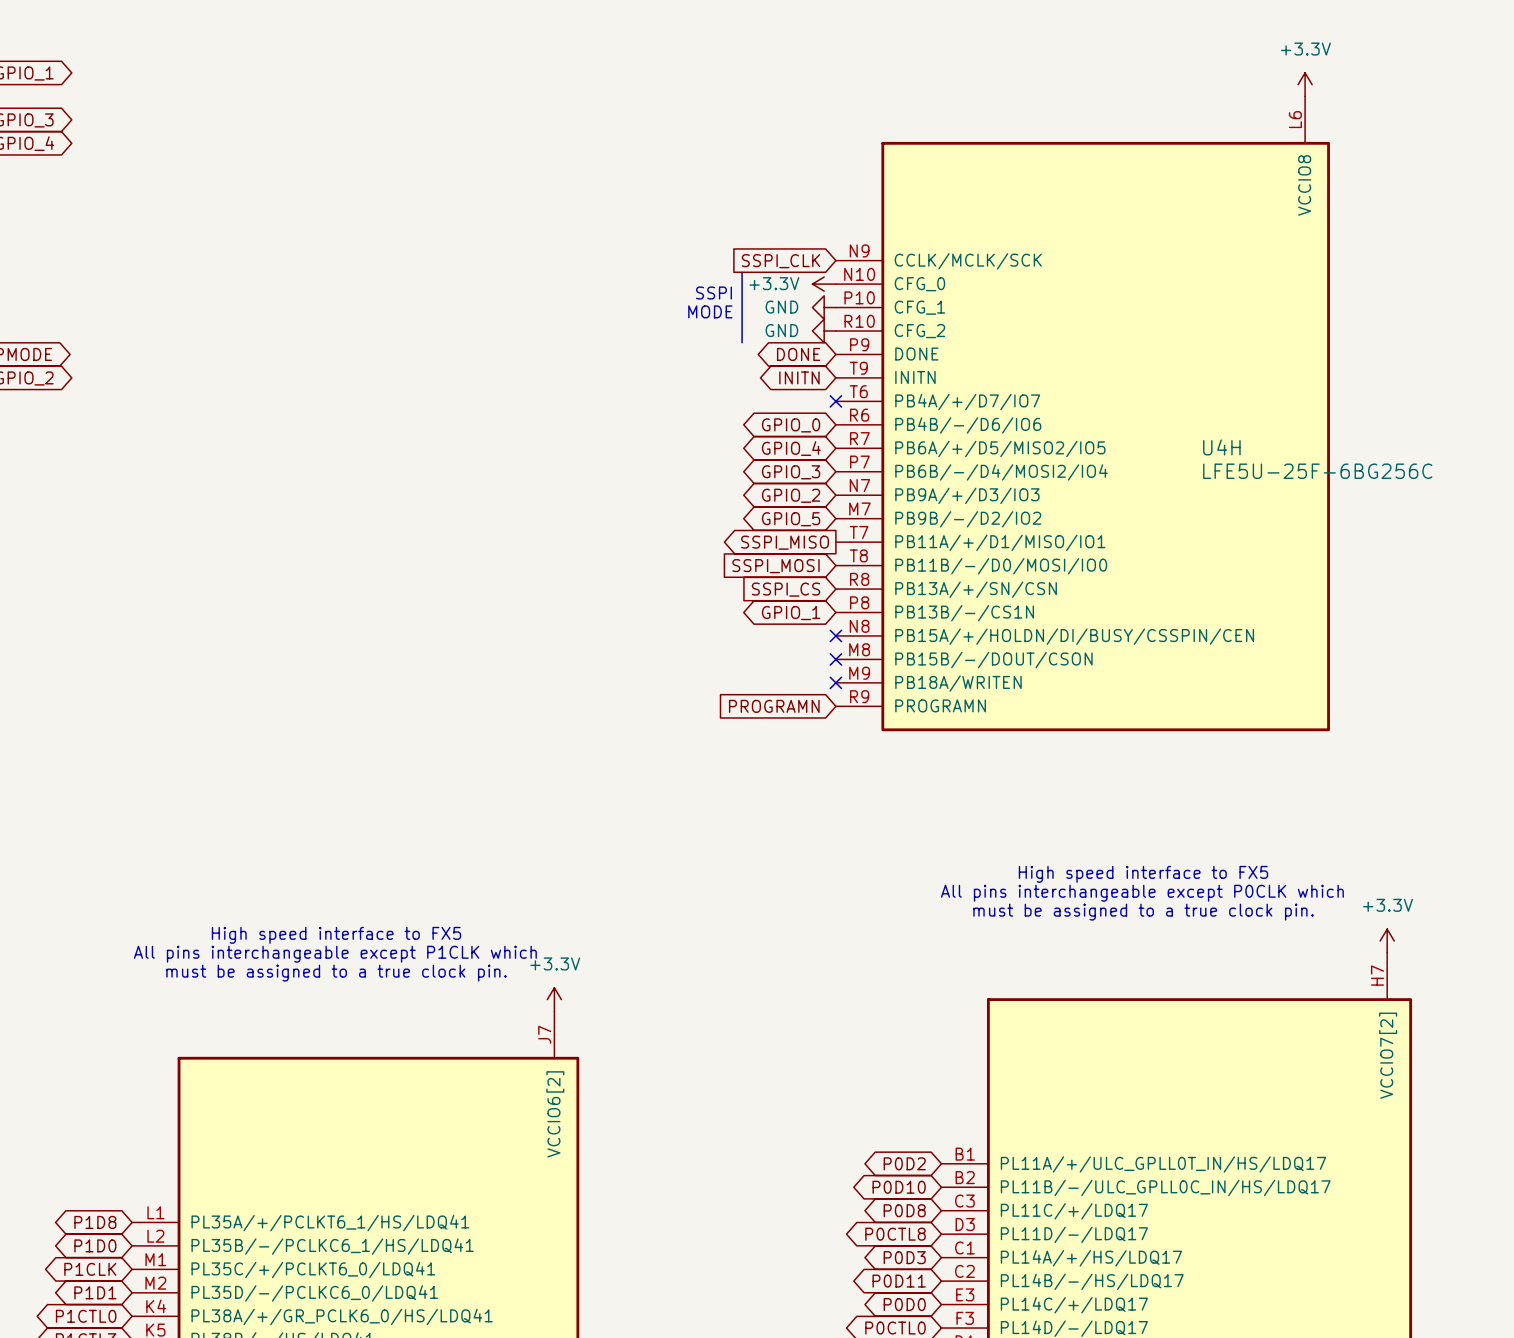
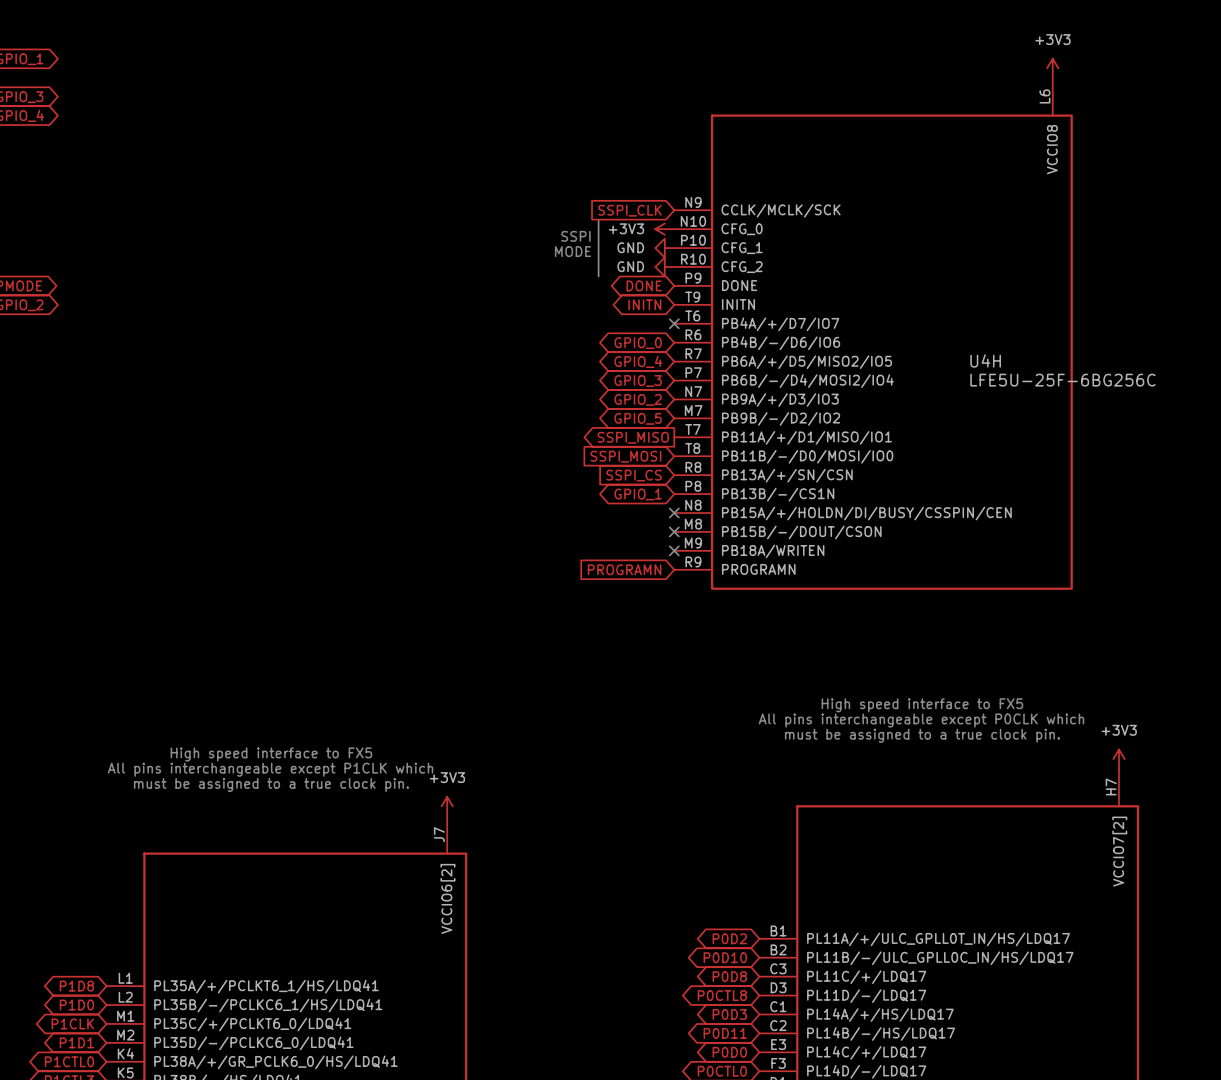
power symbol: +3.3V (1305, 84) -> +3V3 (1052, 68)
power symbol: +3.3V (824, 284) -> +3V3 (664, 229)
power symbol: +3.3V (1387, 940) -> +3V3 (1118, 759)
power symbol: +3.3V (554, 999) -> +3V3 (447, 806)

